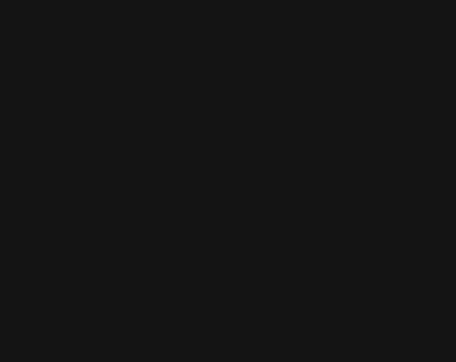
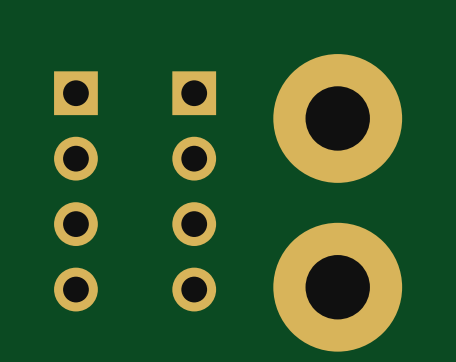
part: none -> (337, 118)
part: none -> (75, 191)
part: none -> (194, 191)
part: none -> (337, 287)

